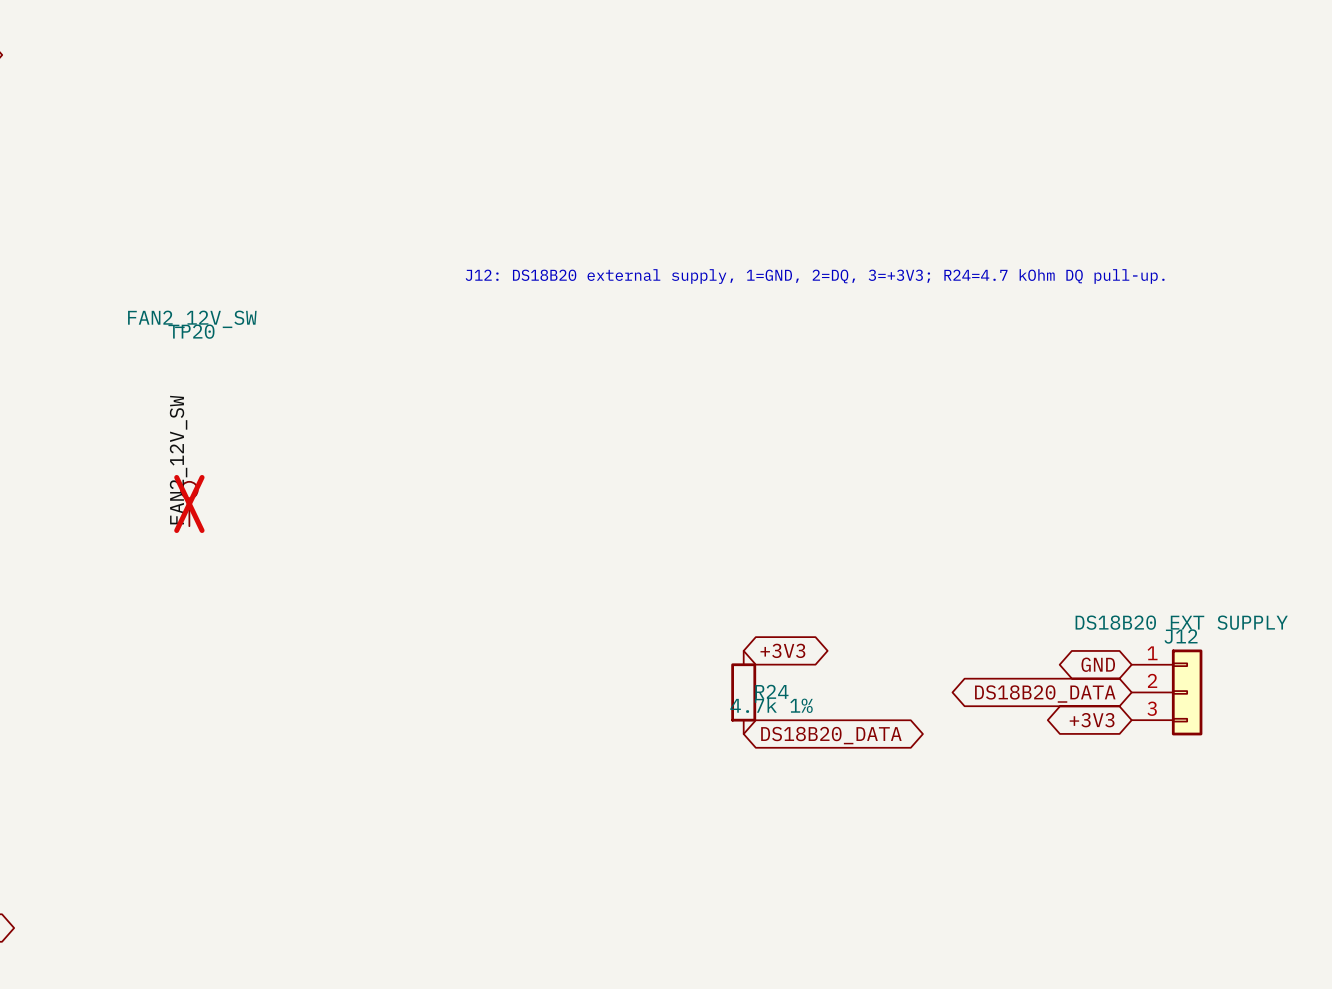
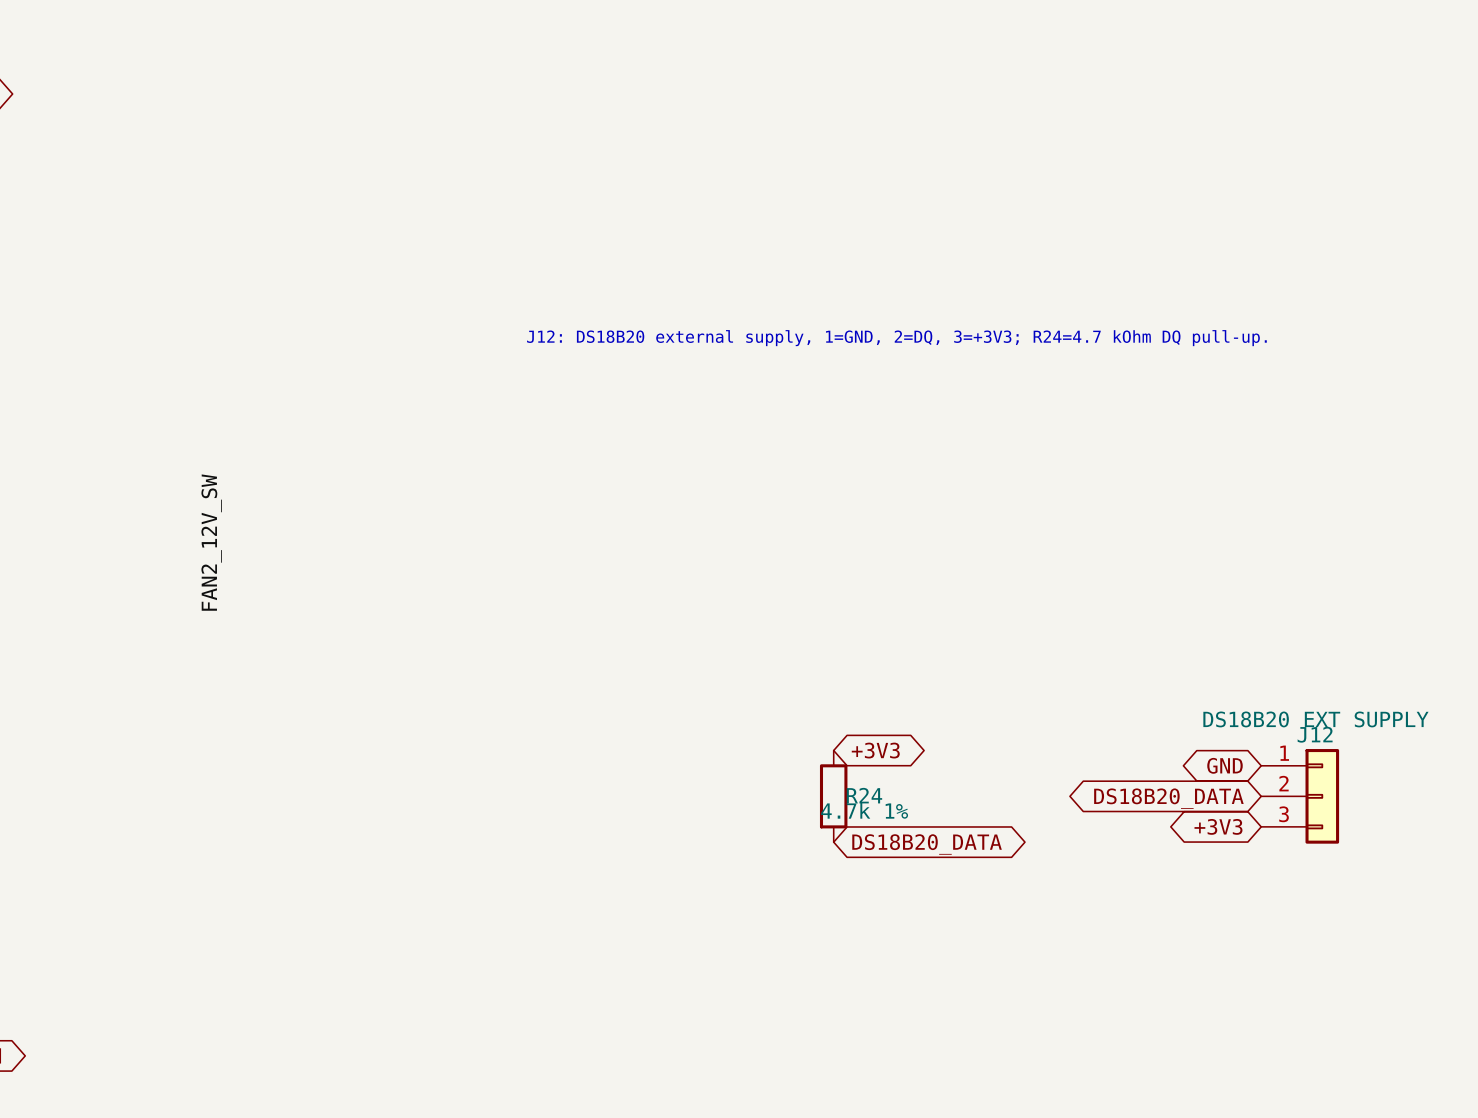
TP20: FAN2_12V_SW (189, 503) -> none

